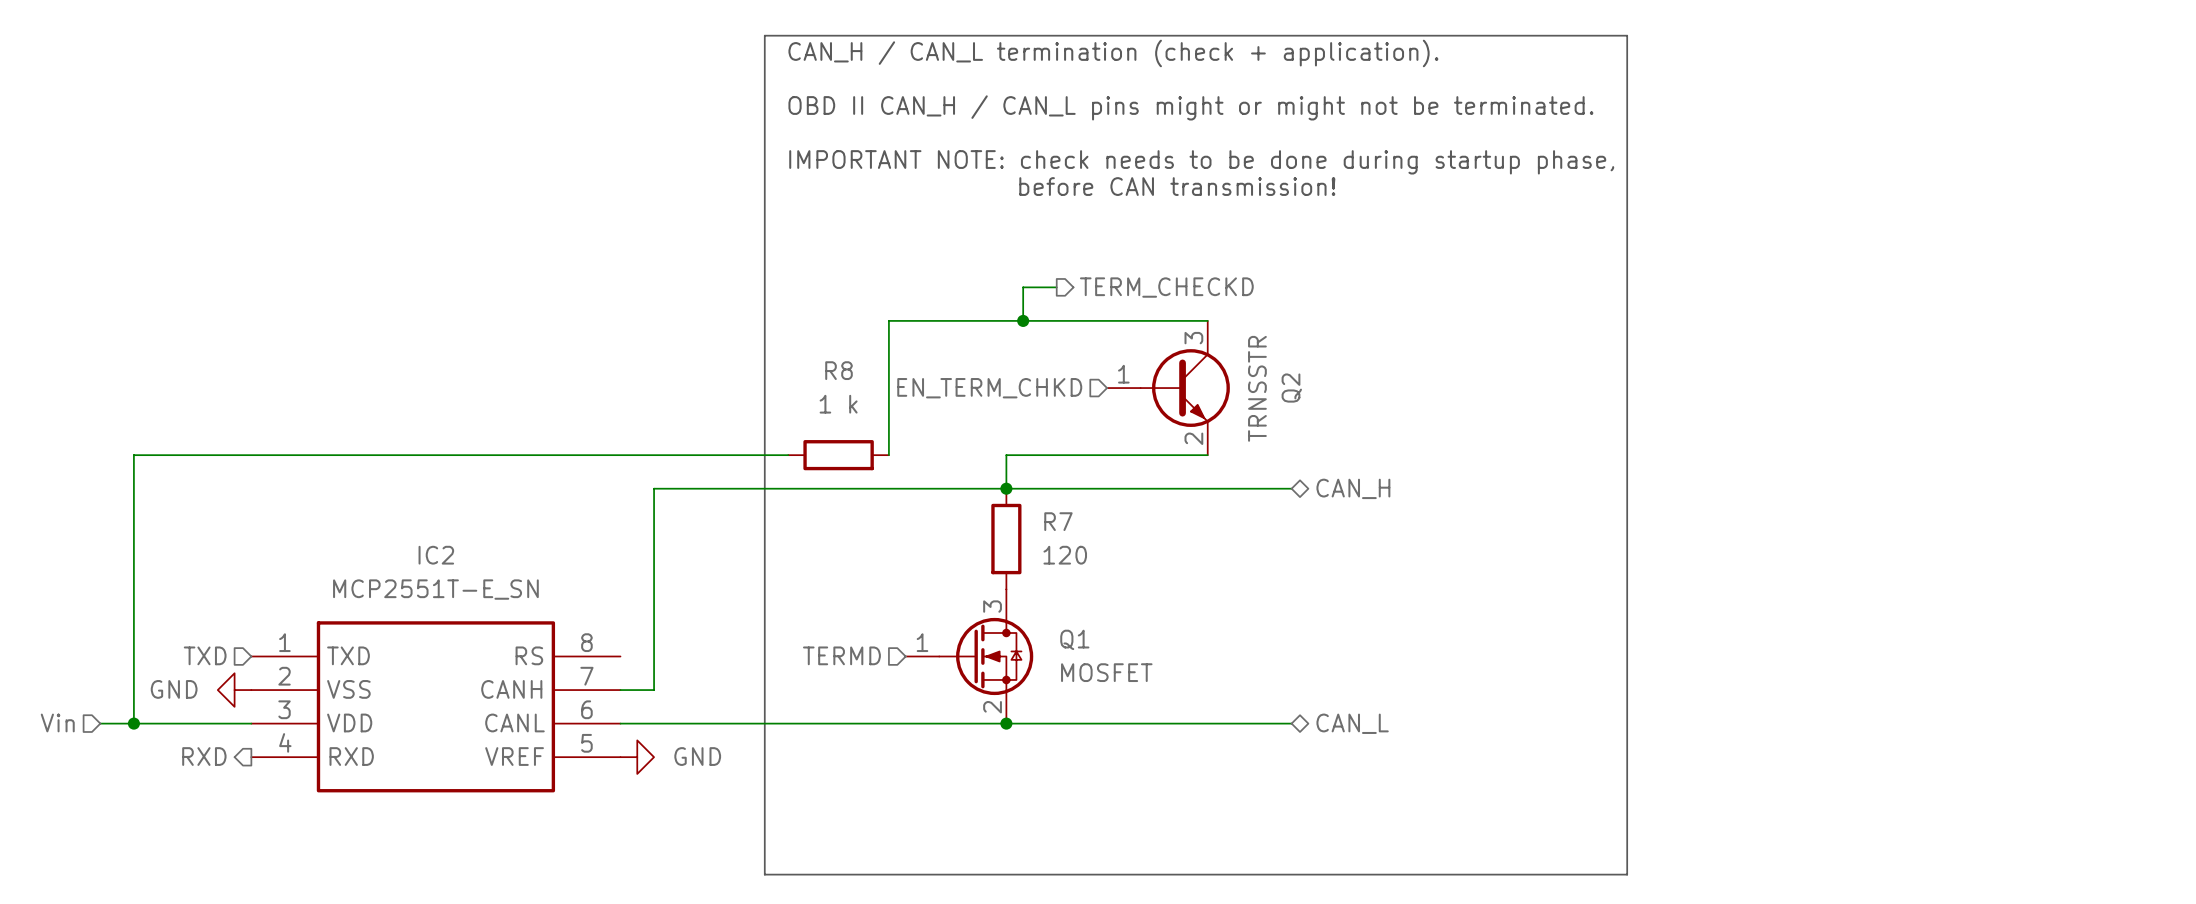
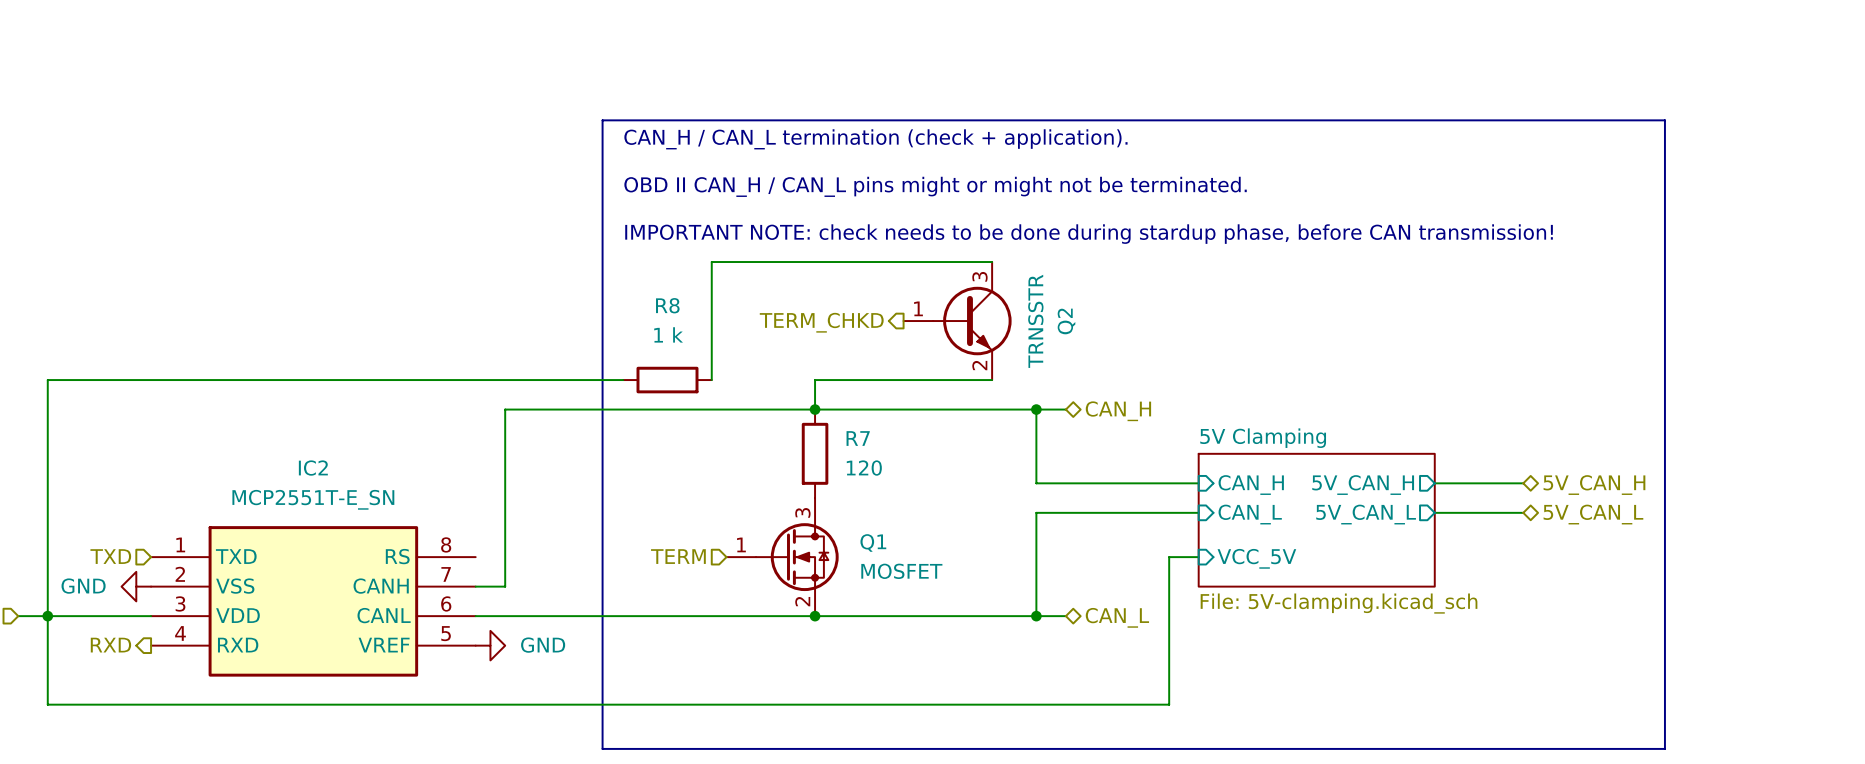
text position: CAN_H / CAN_L termination (check + application). (1113, 53) -> CAN_H / CAN_L termination (check + application). (875, 139)
text position: OBD II CAN_H / CAN_L pins might or might not be terminated. (1190, 107) -> OBD II CAN_H / CAN_L pins might or might not be terminated. (935, 186)
line: (764, 159) (764, 35) (1627, 35) (1627, 874) -> (602, 120) (1664, 120) (1664, 748) (1361, 748)
text: IMPORTANT NOTE: check needs to be done during startup phase, (1201, 162) -> none
text: before CAN transmission! (1177, 186) -> none
wire: (1056, 287) (1023, 287) (1023, 320) -> none
hierarchical label: TERM_CHECKD (1166, 287) -> none
text: none -> IMPORTANT NOTE: check needs to be done during stardup phase, before CAN transmission! (1089, 234)
junction: (1023, 320) -> none
hierarchical label shape: input (989, 388) -> output (821, 322)
hierarchical label: EN_TERM_CHKD (989, 388) -> TERM_CHKD (821, 322)
wire: none -> (1036, 409) (1036, 483) (1198, 483)
junction: none -> (1036, 409)
sheet pin: none -> CAN_H (1251, 485)
sheet pin: none -> 5V_CAN_H (1363, 485)
wire: none -> (1434, 483) (1523, 483)
hierarchical label: none -> 5V_CAN_H (1594, 485)
wire: none -> (1198, 512) (1036, 512) (1036, 616)
sheet pin: none -> CAN_L (1250, 514)
sheet pin: none -> 5V_CAN_L (1366, 514)
wire: none -> (1434, 512) (1523, 512)
hierarchical label: none -> 5V_CAN_L (1593, 514)
sheet 5V Clamping: none -> File: 5V-clamping.kicad_sch (1316, 520)
hierarchical label: TERMD (841, 655) -> TERM (678, 556)
wire: none -> (1198, 557) (1169, 557) (1169, 704) (47, 704) (47, 616)
sheet pin: none -> VCC_5V (1256, 558)
junction: none -> (1036, 616)

